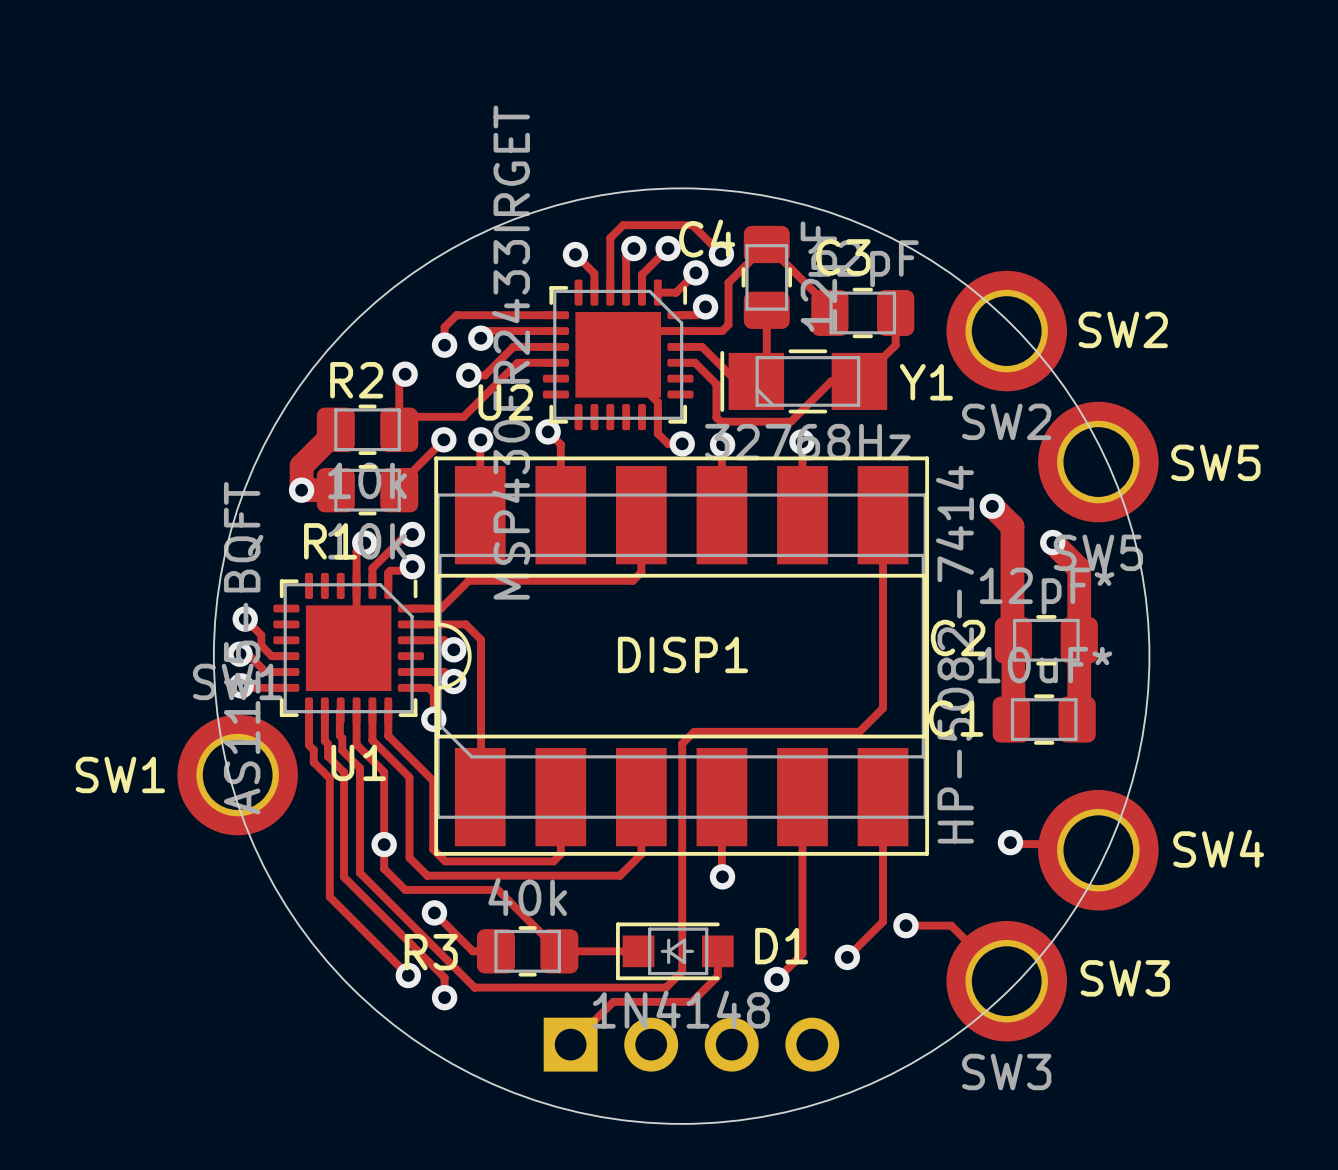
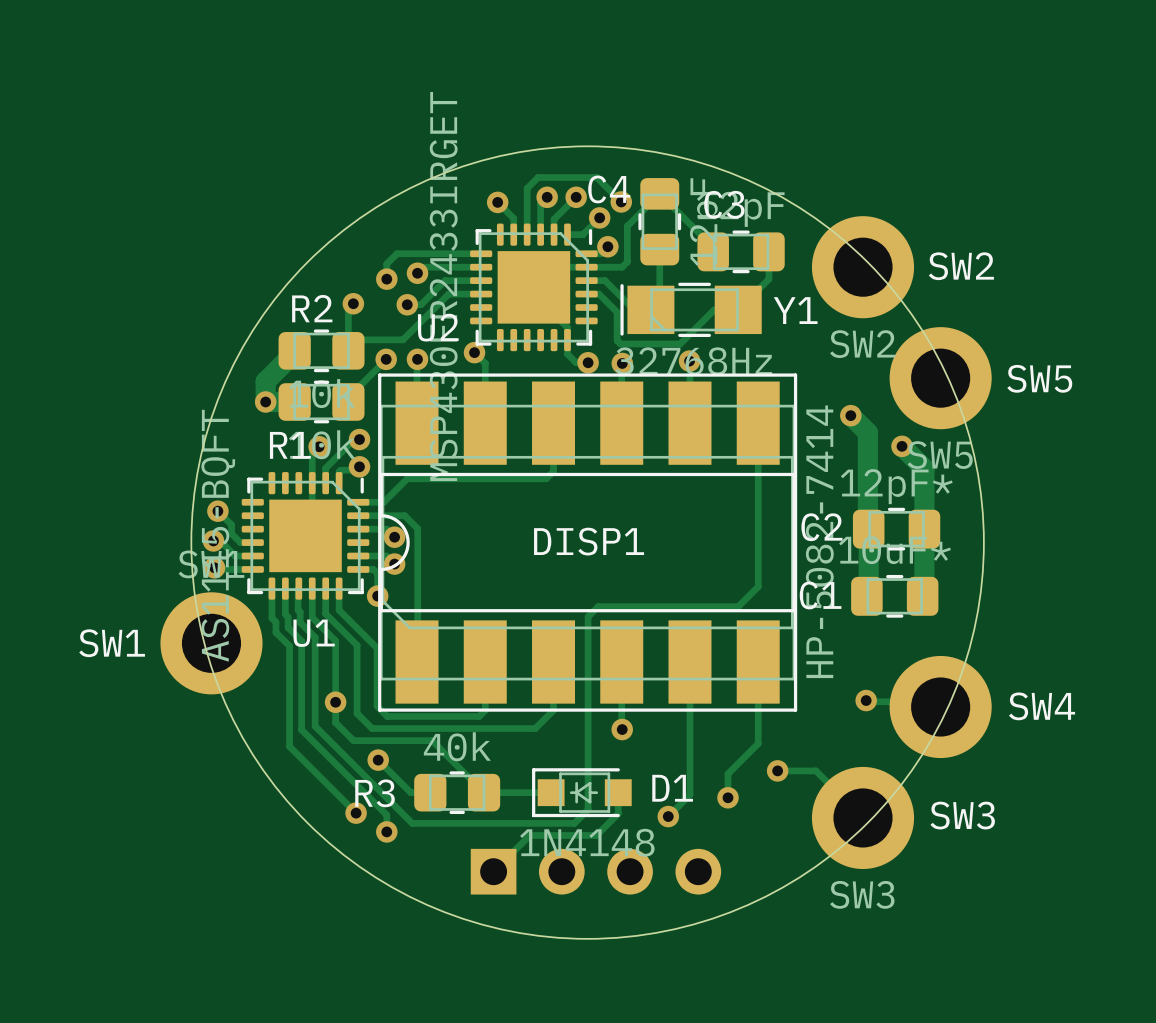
track: (883, 893) (883, 921) (847, 957) -> (758, 743) (728, 773) (728, 797)

